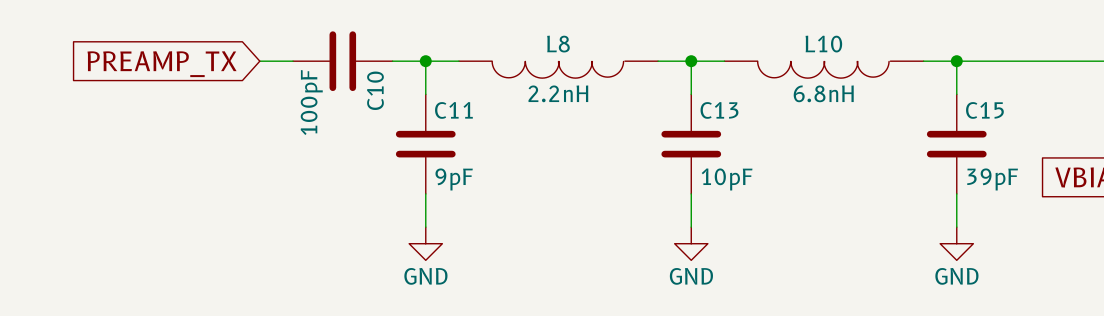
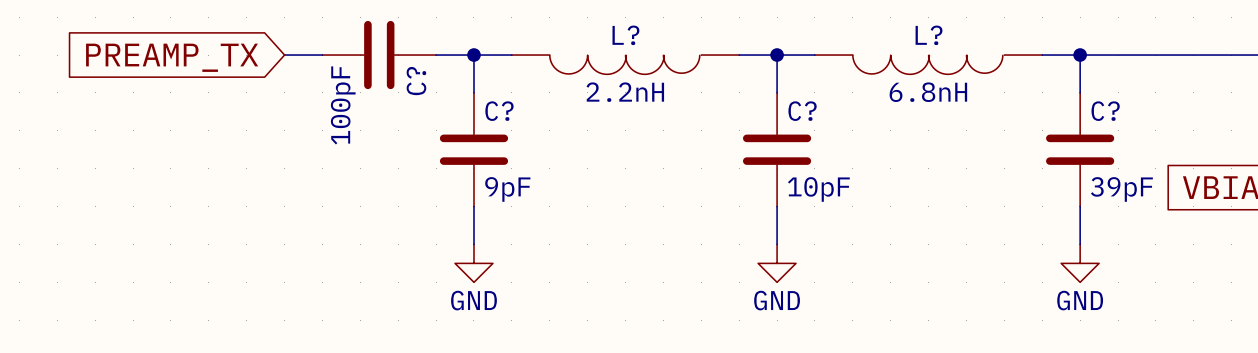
L8 name: L8 (558, 44) -> L? (625, 35)
L10 name: L10 (823, 44) -> L? (929, 35)
C10 name: C10 (375, 90) -> C? (416, 81)
C11 name: C11 (453, 110) -> C? (499, 111)
C13 name: C13 (719, 110) -> C? (802, 111)
C15 name: C15 (984, 110) -> C? (1105, 111)

